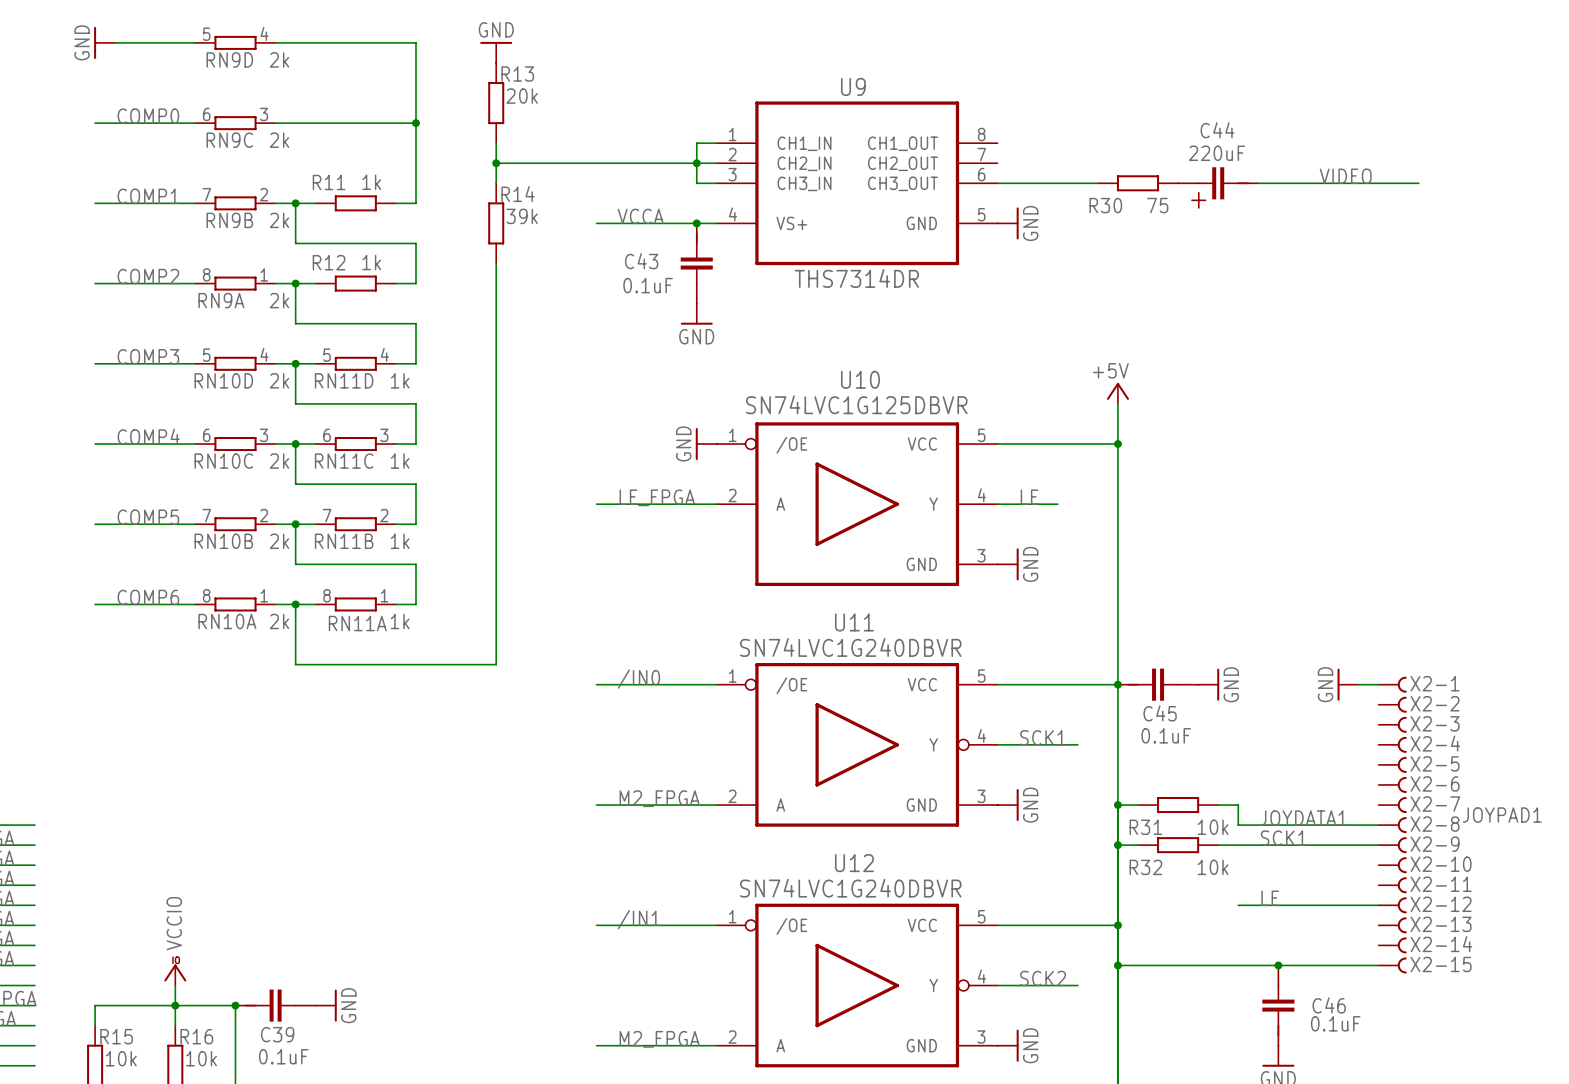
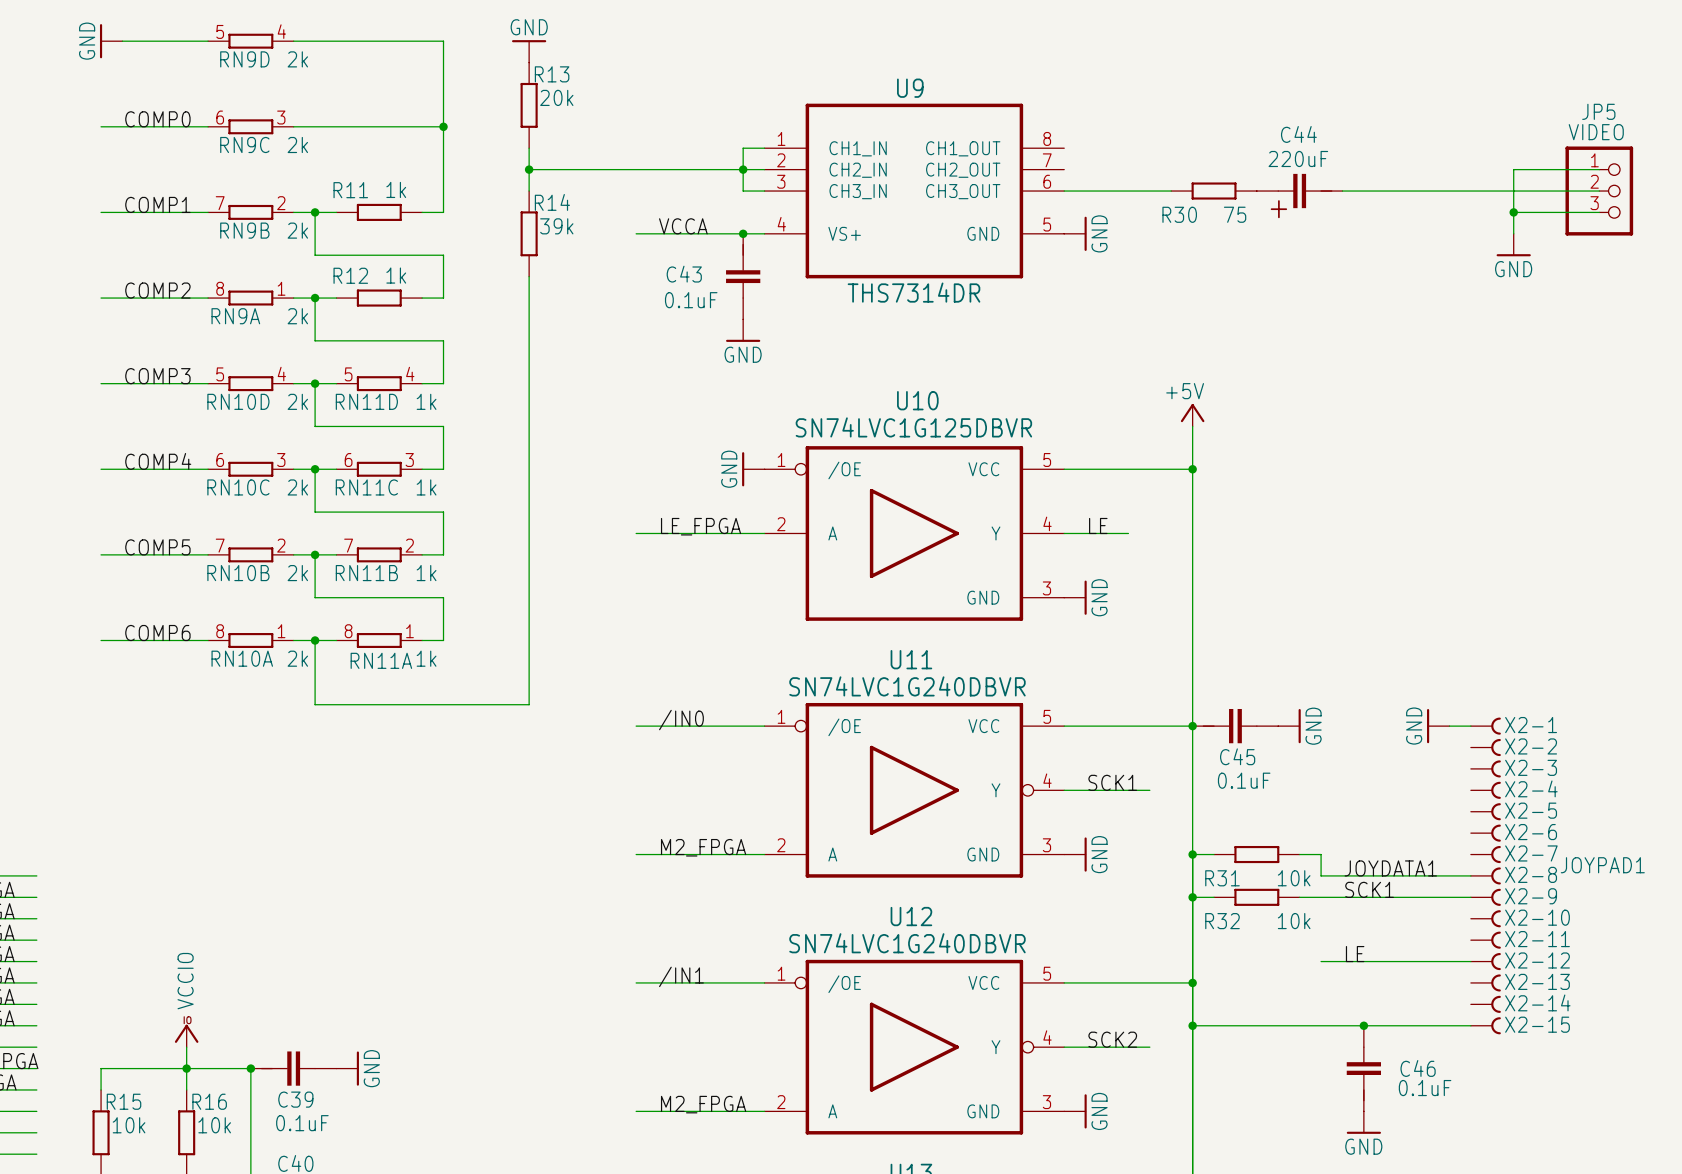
wire: none -> (1599, 169) (1513, 169) (1513, 233)
label: VIDEO (1345, 176) -> none
wire: none -> (1513, 191) (1599, 191)
JP5: none -> VIDEO (1599, 191)
wire: none -> (1513, 212) (1599, 212)
junction: none -> (1513, 212)
power symbol: none -> GND (1513, 245)

